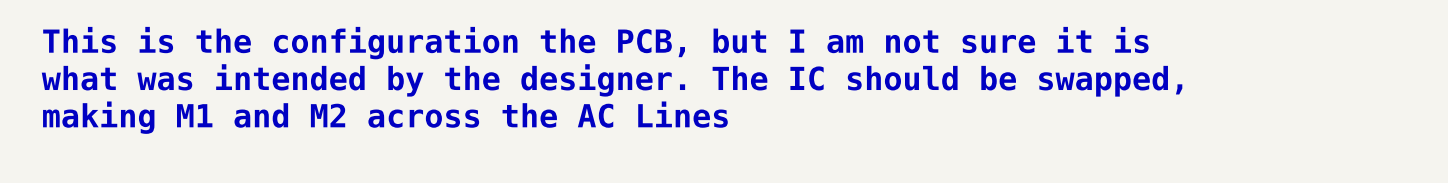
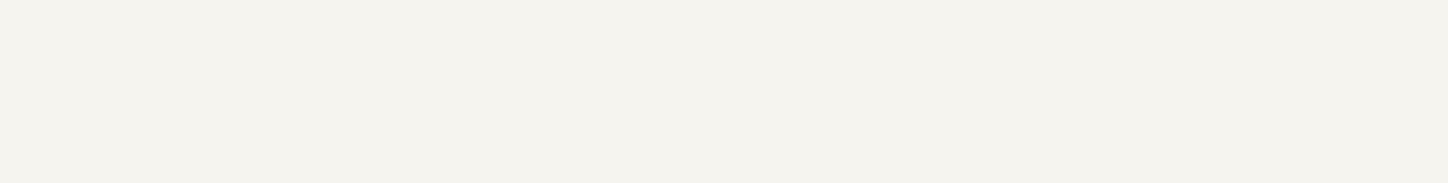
text: This is the configuration the PCB, but I am not sure it is (595, 43) -> none
text: what was intended by the designer. The IC should be swapped, (612, 80) -> none
text: making M1 and M2 across the AC Lines (385, 117) -> none

